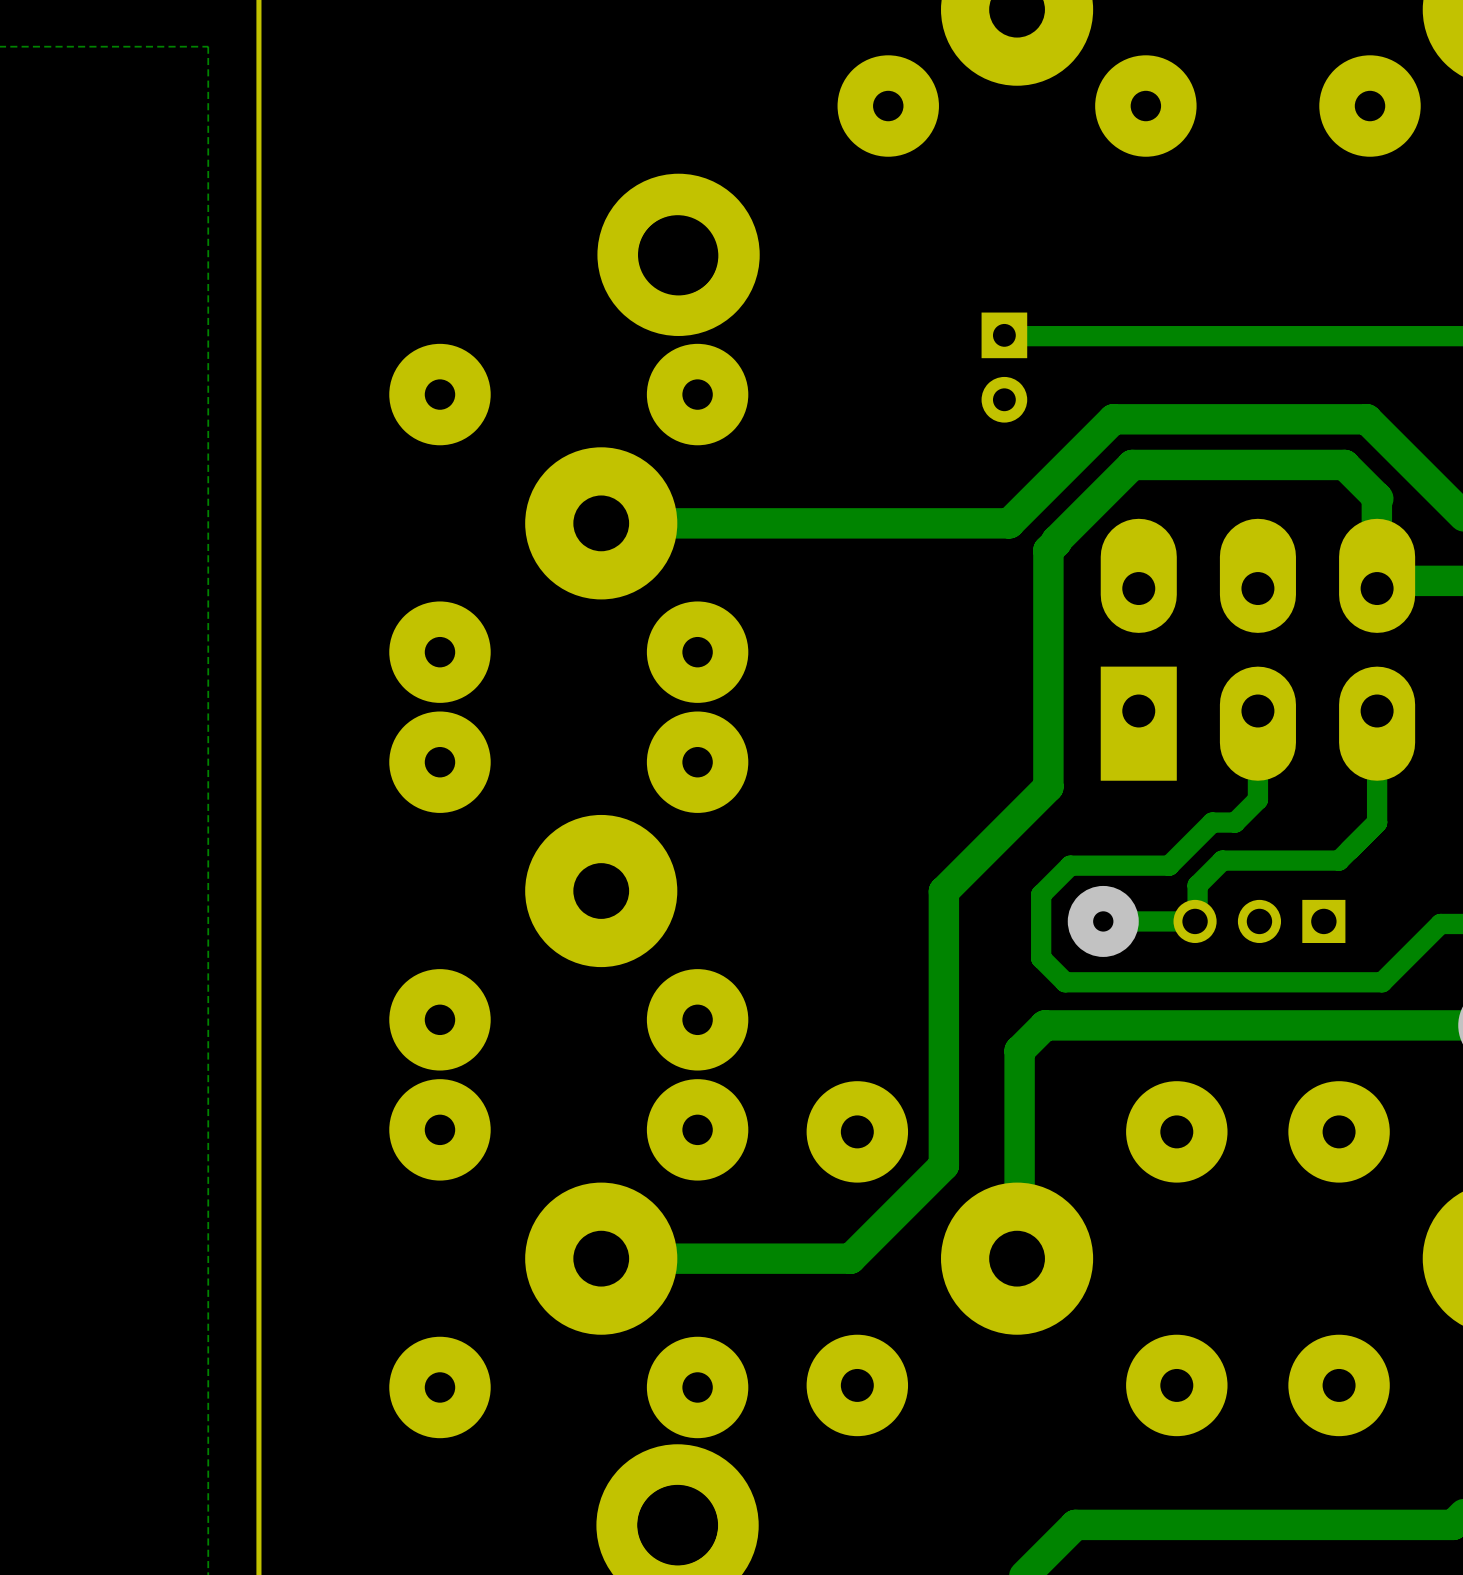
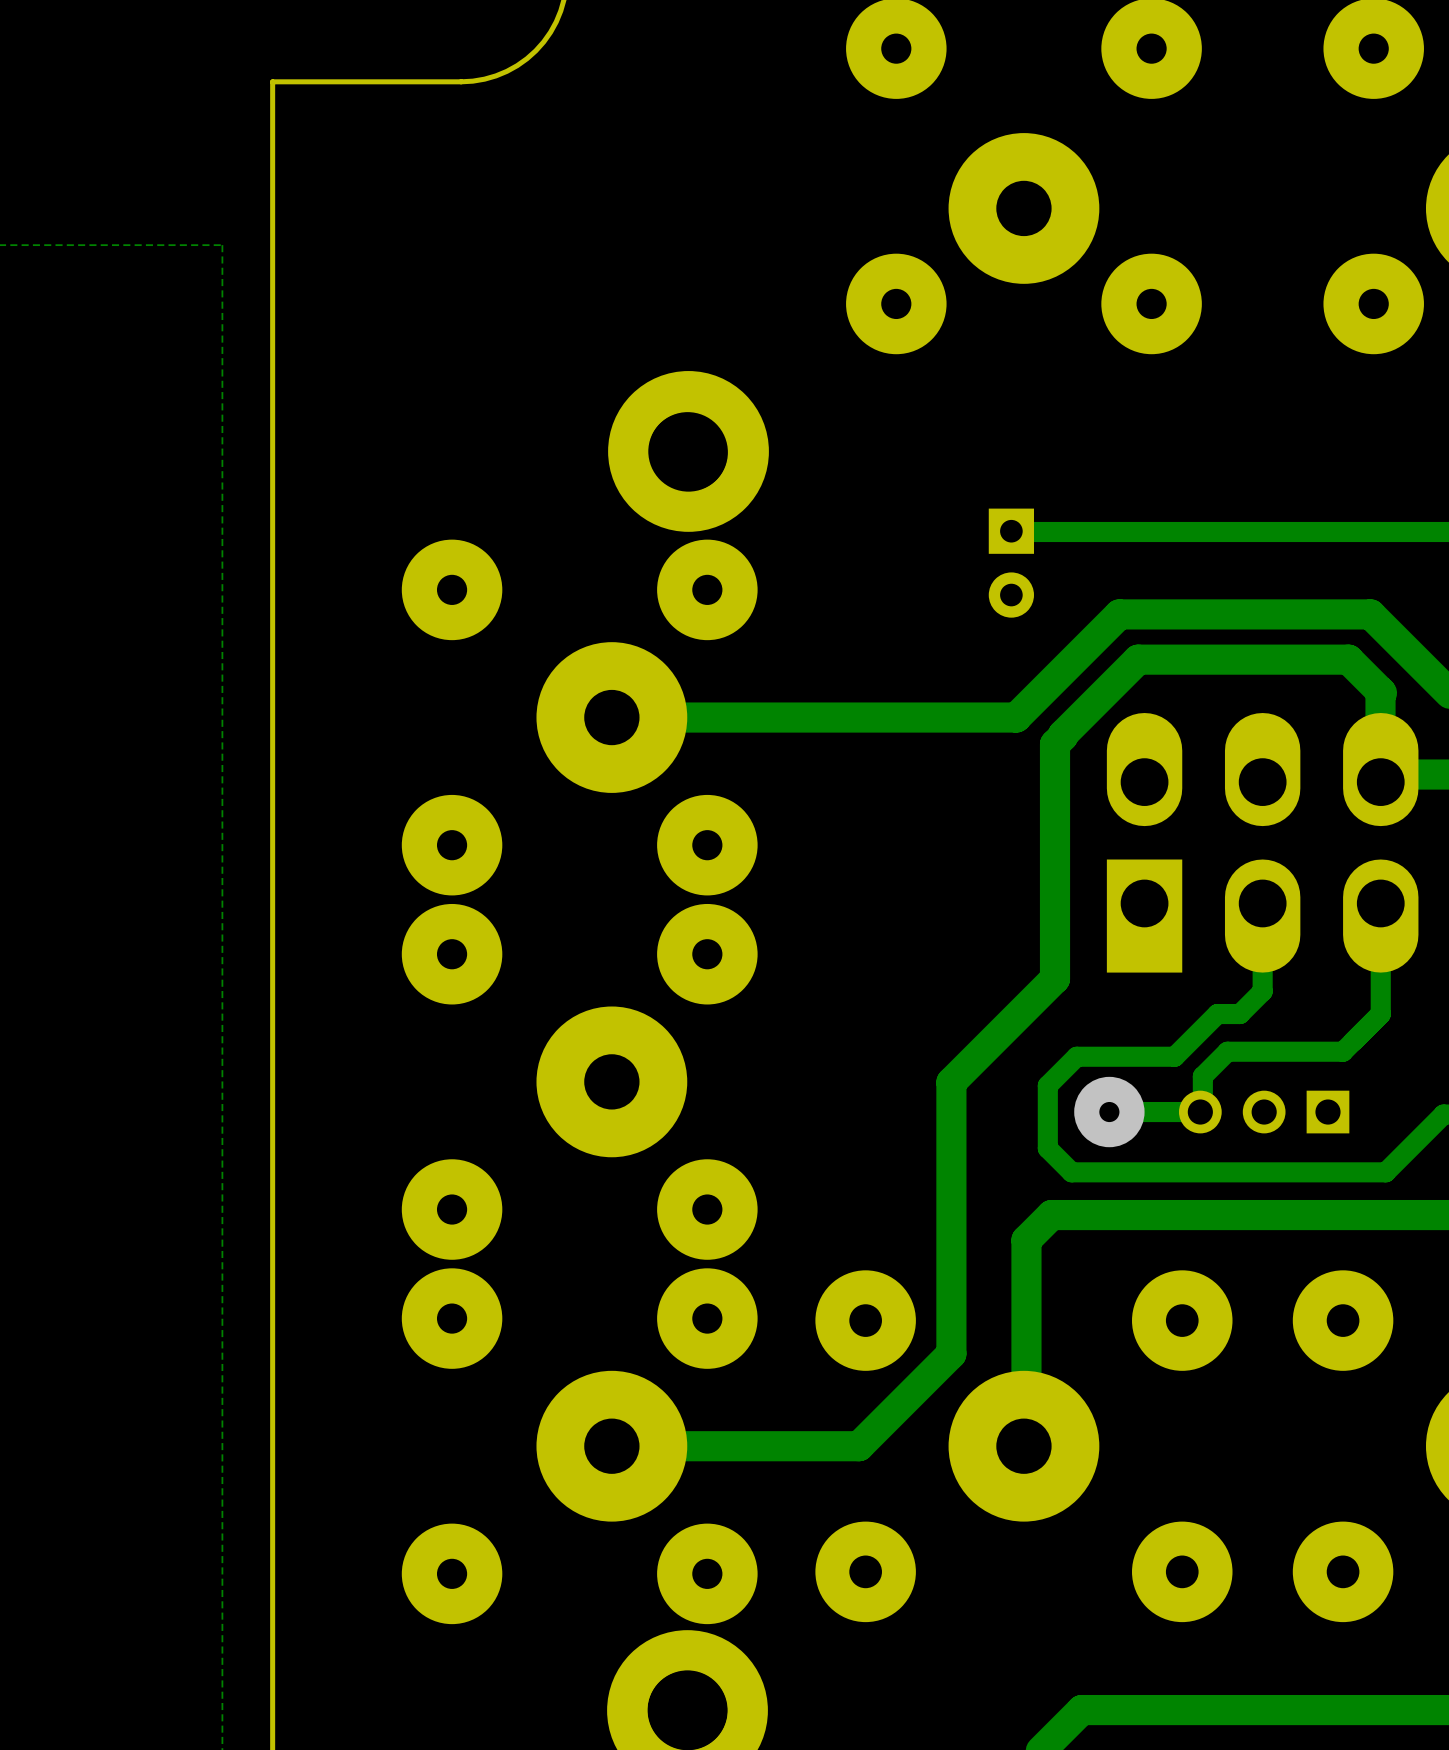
part footprint: [1100, 518, 1416, 781] -> [1106, 713, 1419, 973]

